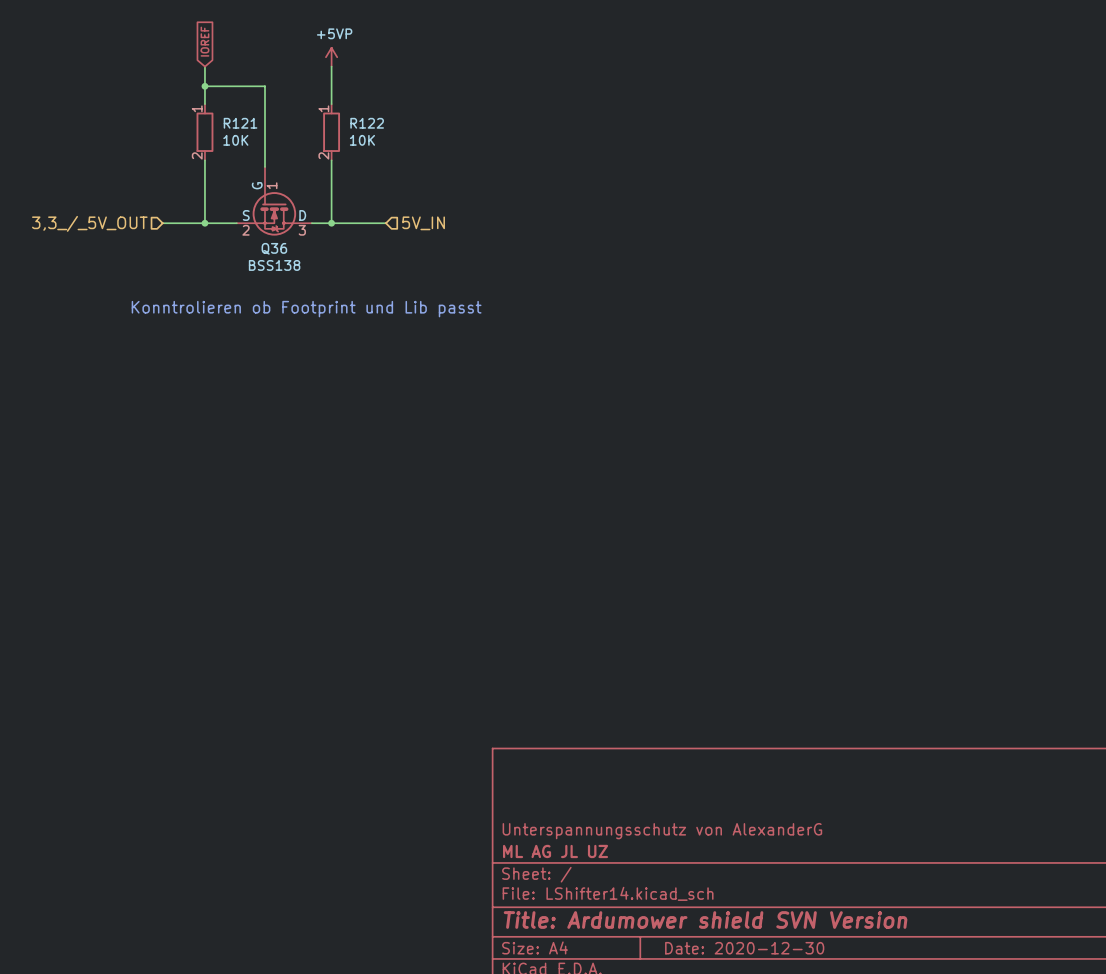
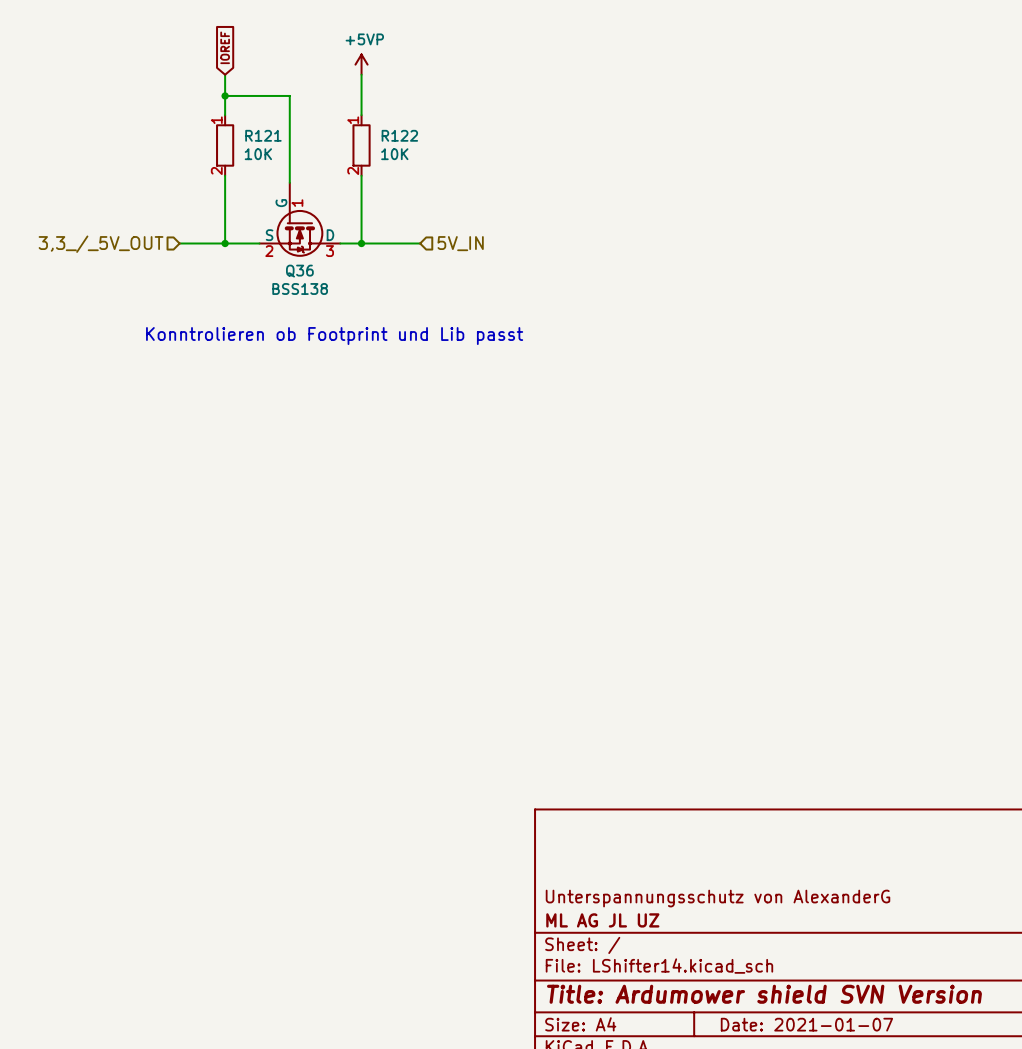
title block: Date: 2020-12-30 (744, 948) -> Date: 2021-01-07 (806, 1024)

